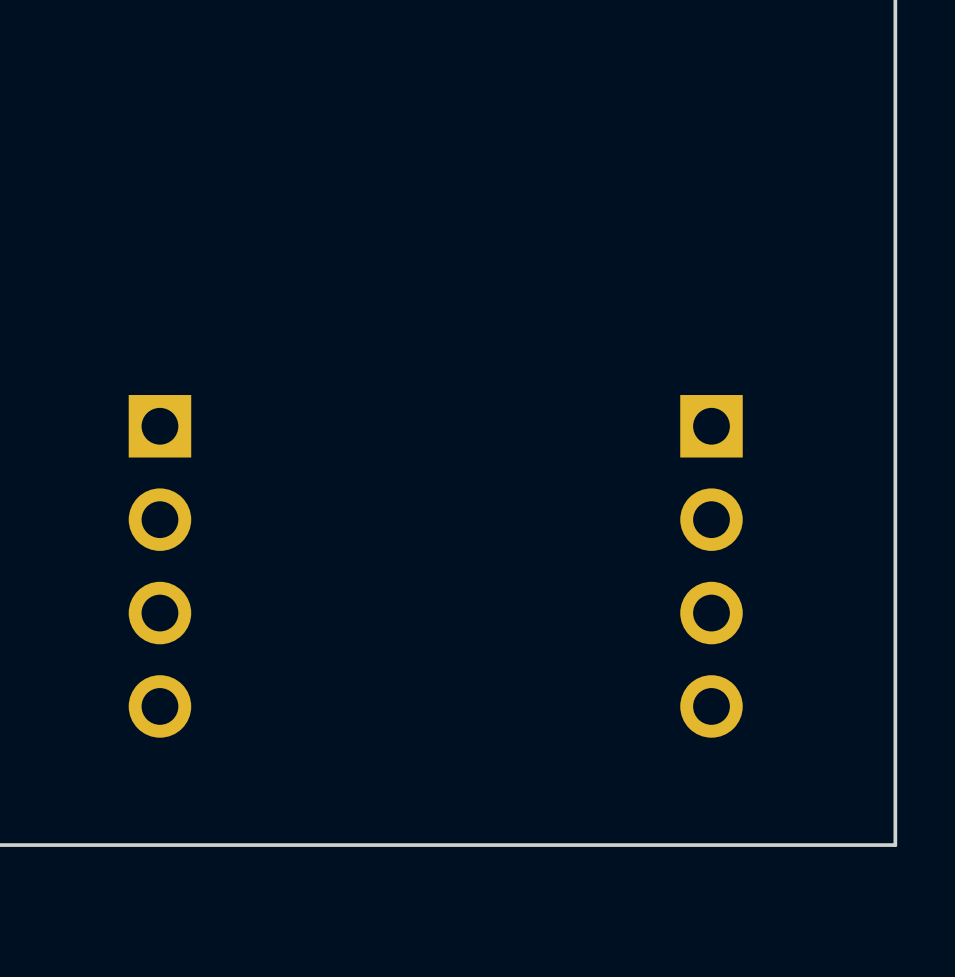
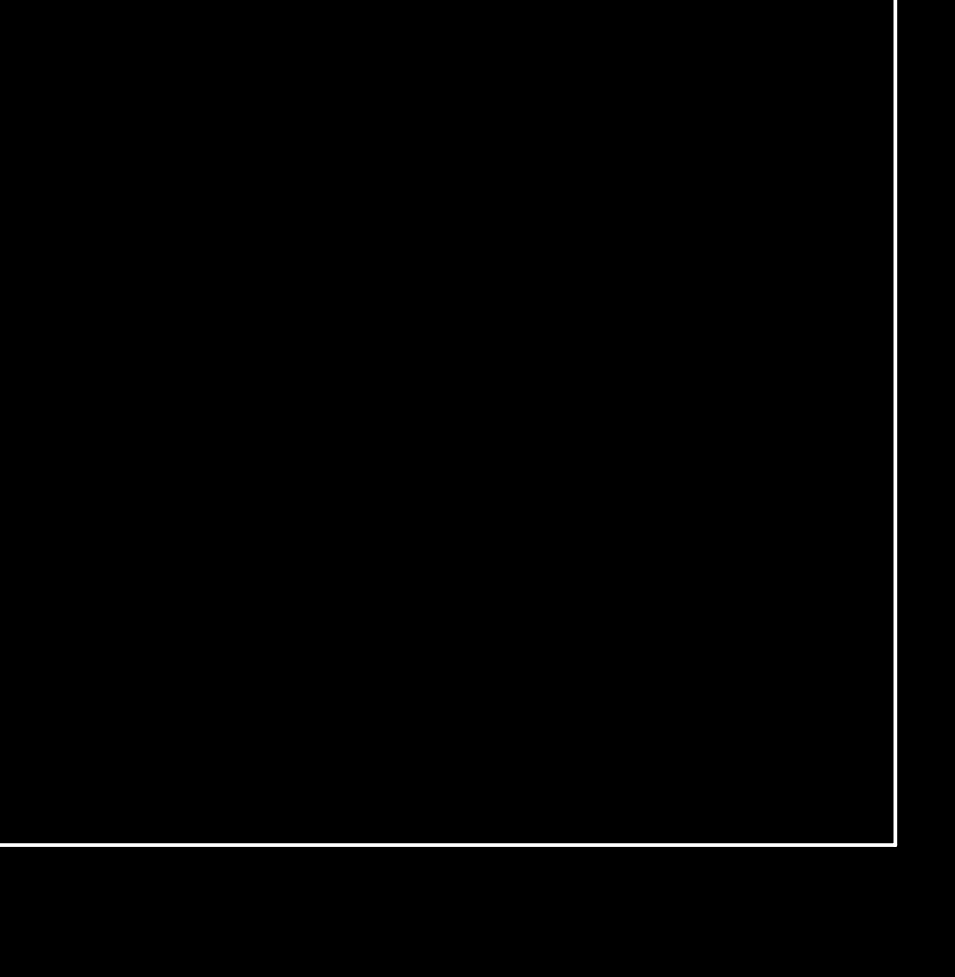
part: (159, 566) -> none
part: (711, 566) -> none

